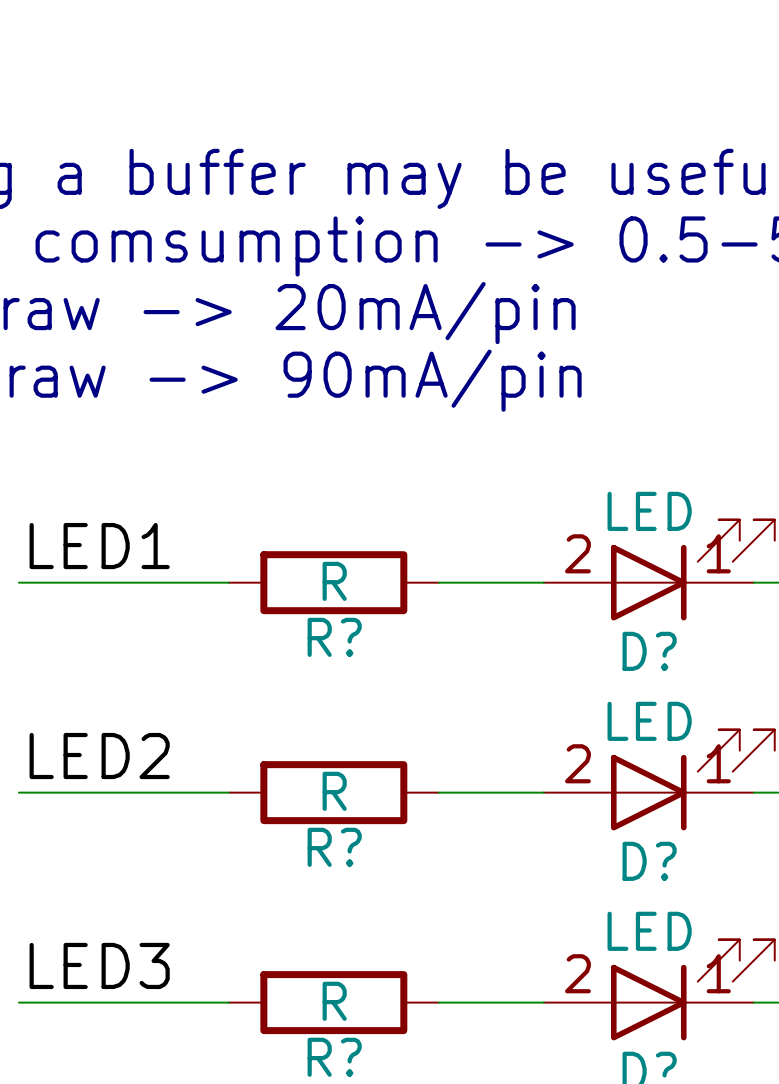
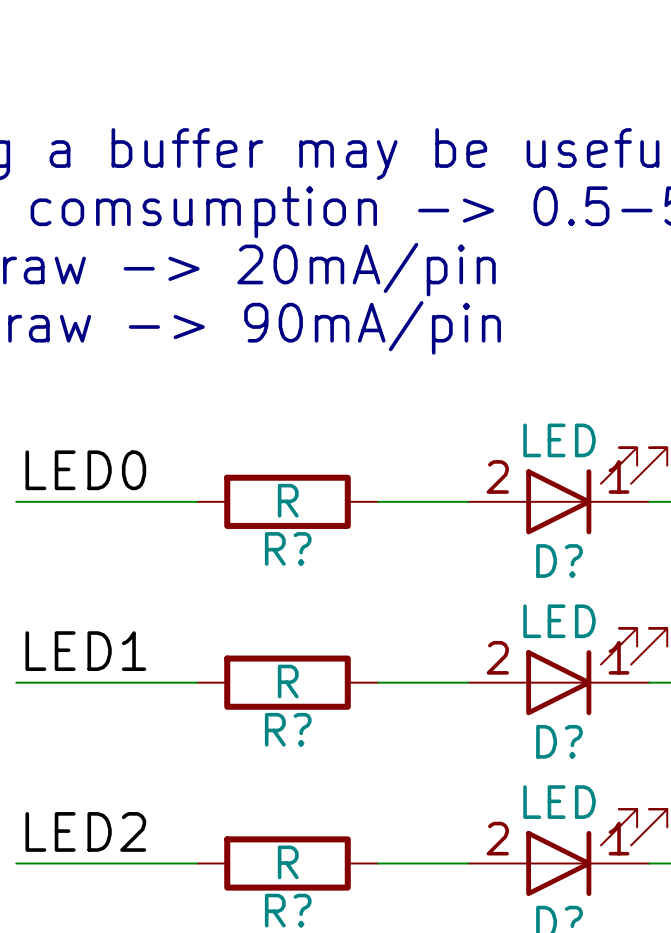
label: LED1 (99, 546) -> LED0 (85, 470)
label: LED2 (99, 756) -> LED1 (85, 651)
label: LED3 (99, 965) -> LED2 (85, 831)

